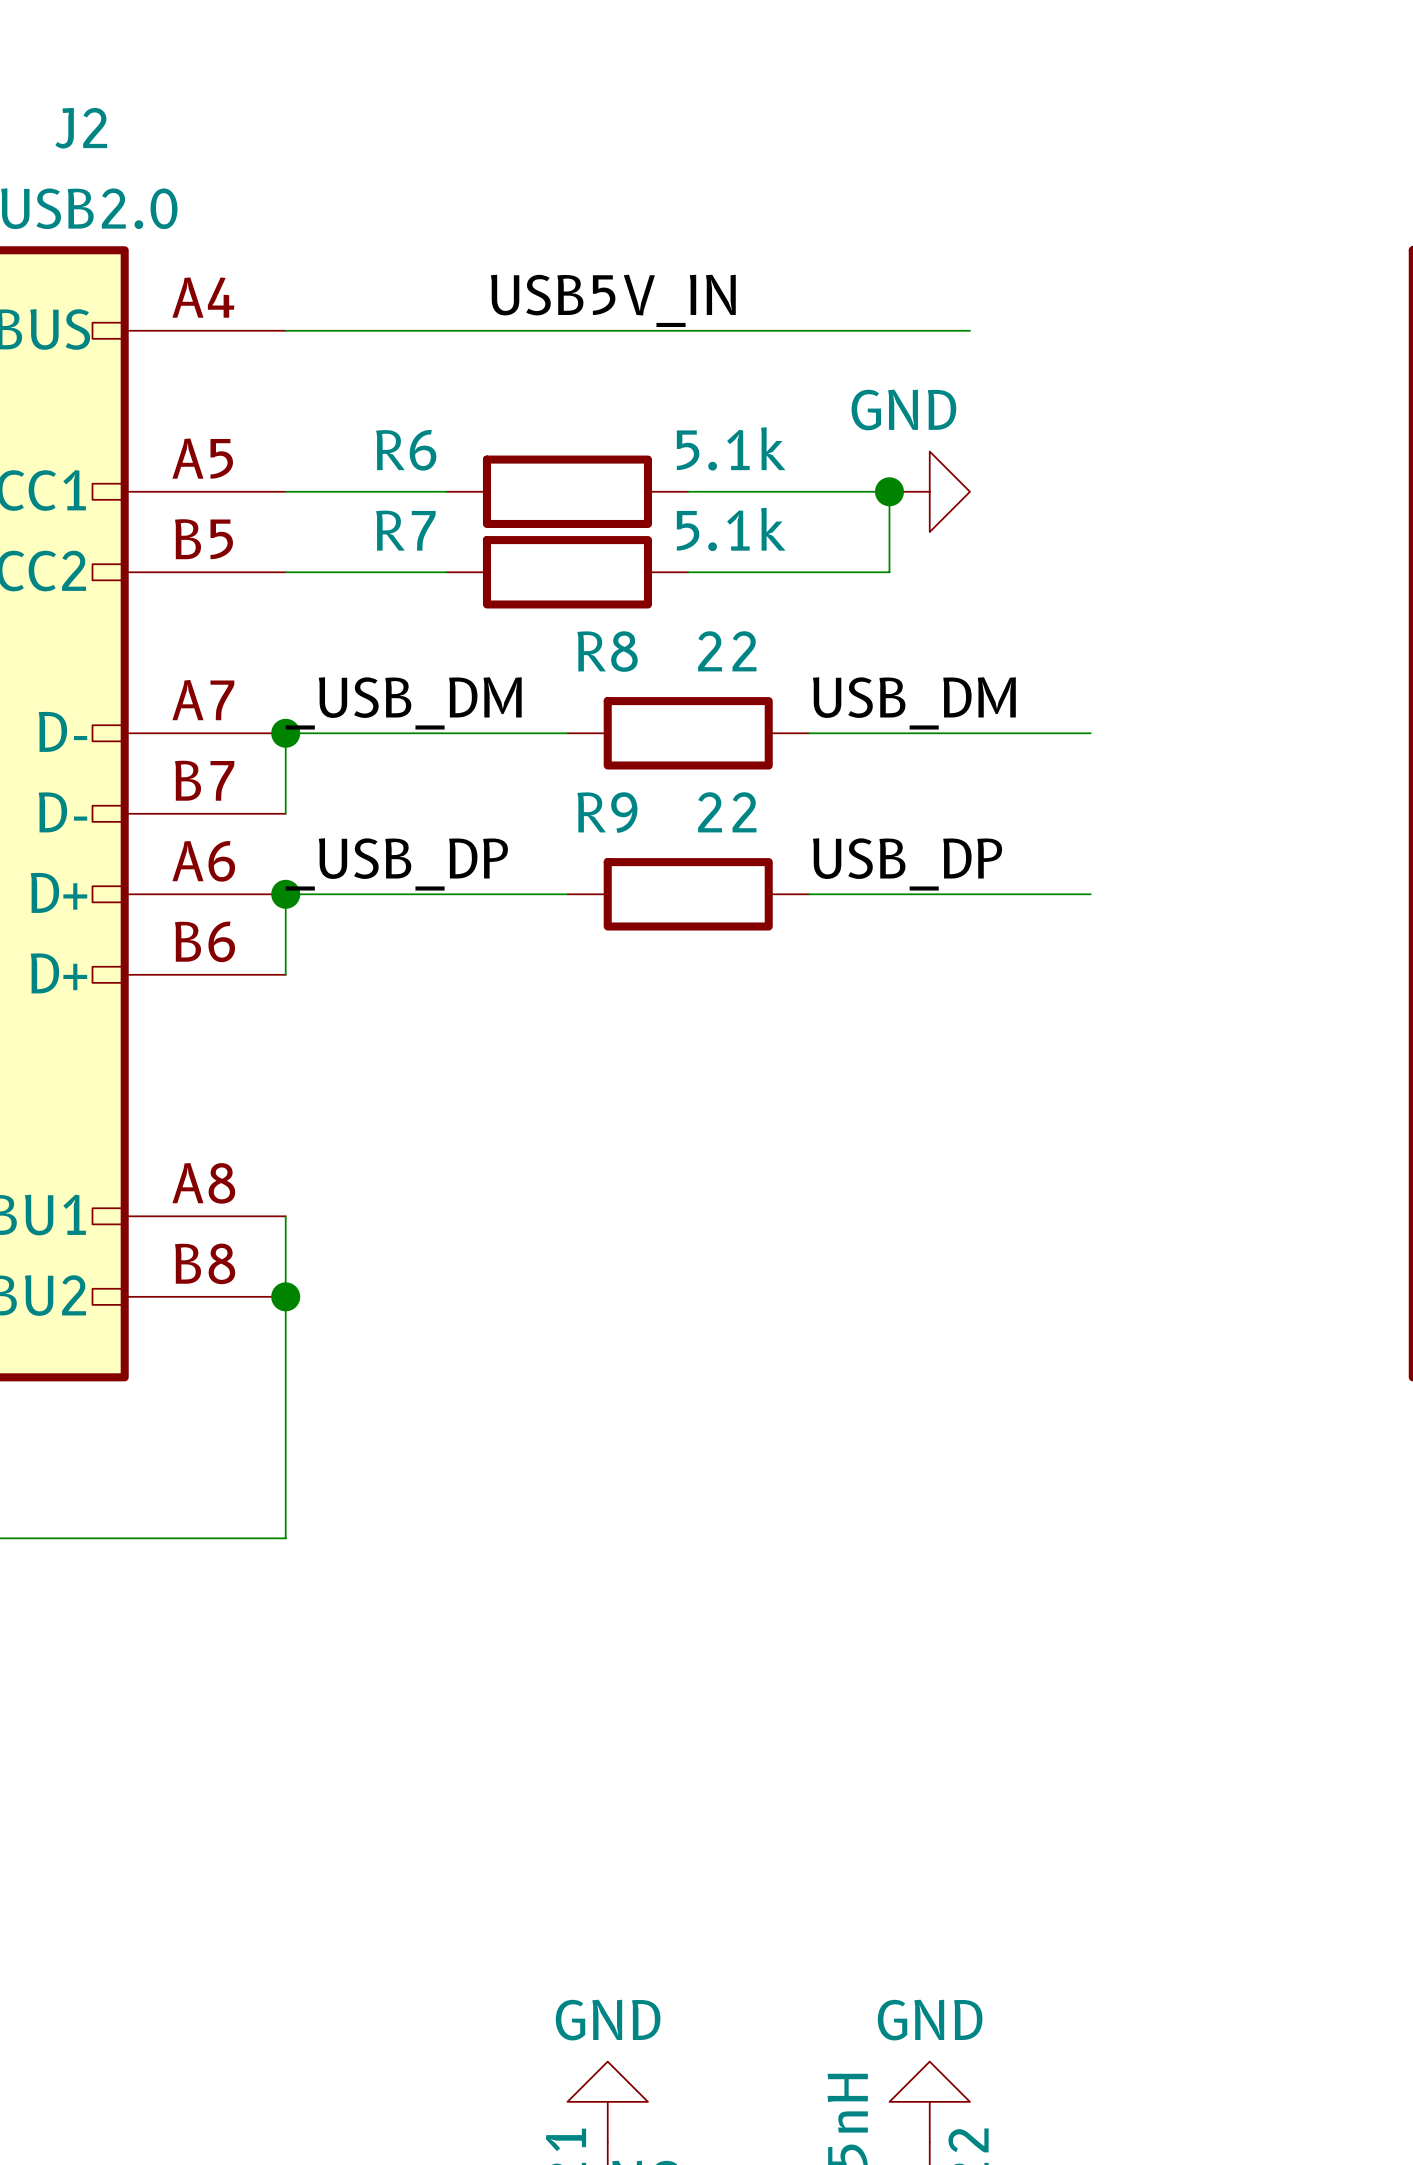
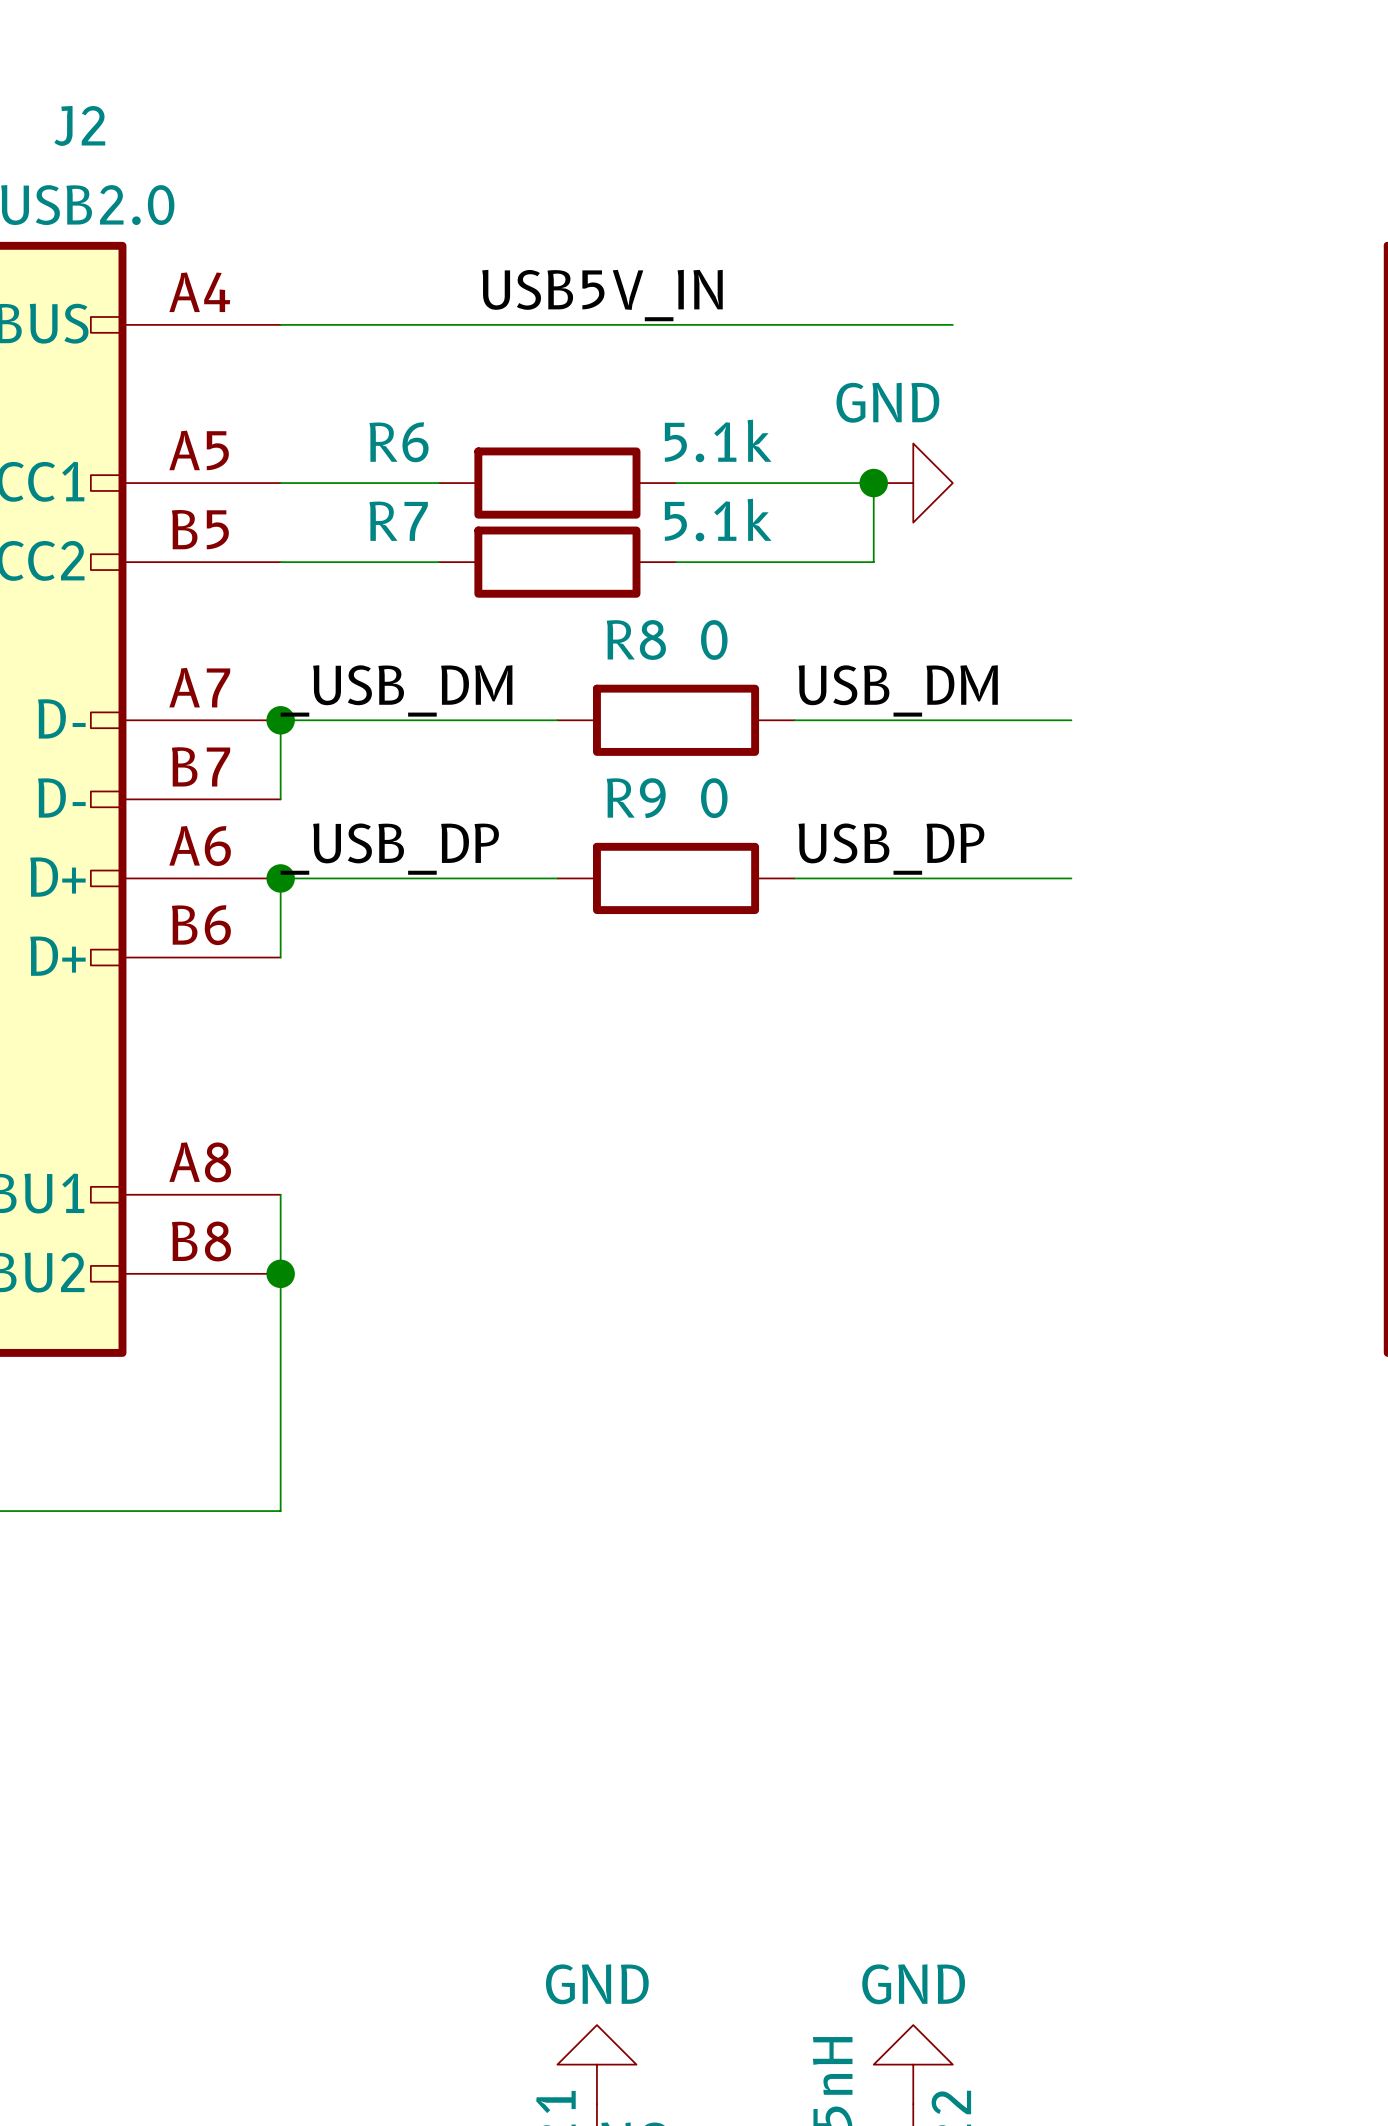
R8 name position: R8 (607, 651) -> R8 (636, 640)
R8 value: 22 (727, 651) -> 0 (714, 640)
R9 name position: R9 (607, 812) -> R9 (636, 798)
R9 value: 22 (727, 812) -> 0 (714, 798)

